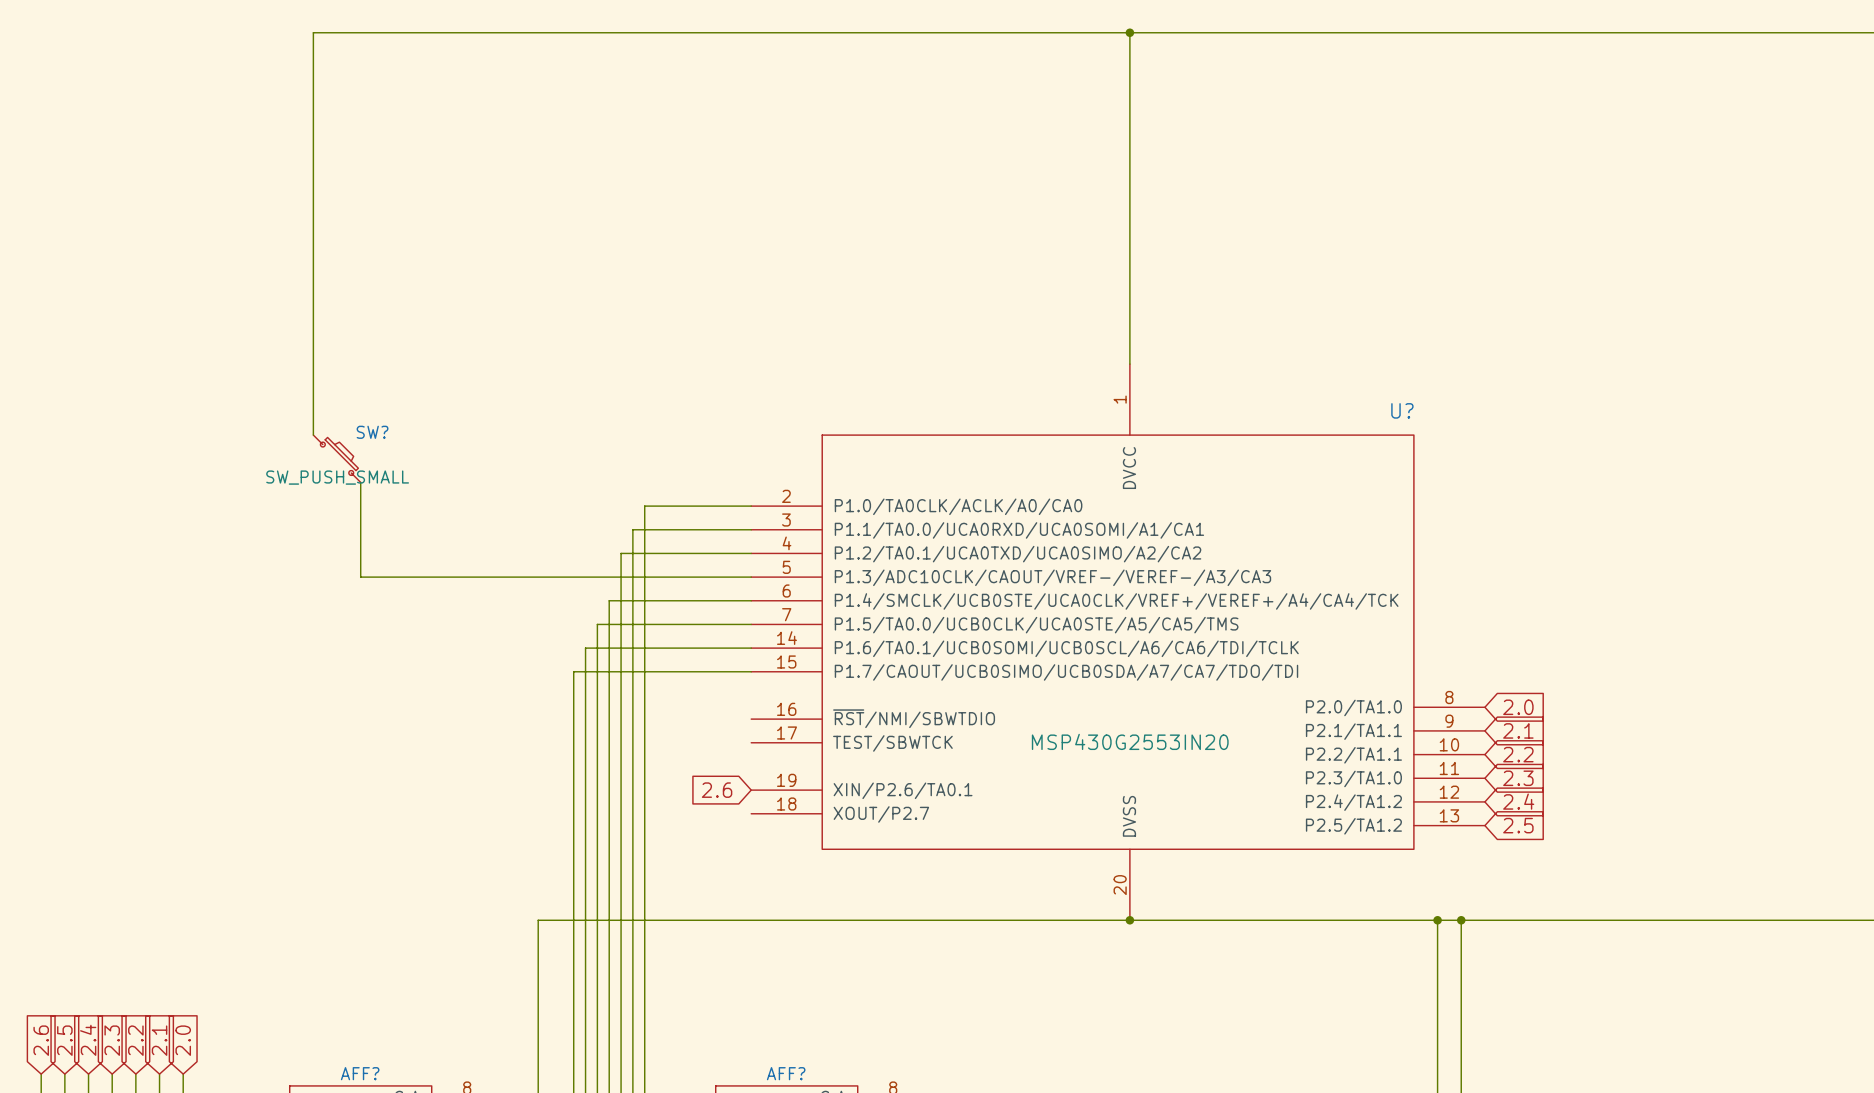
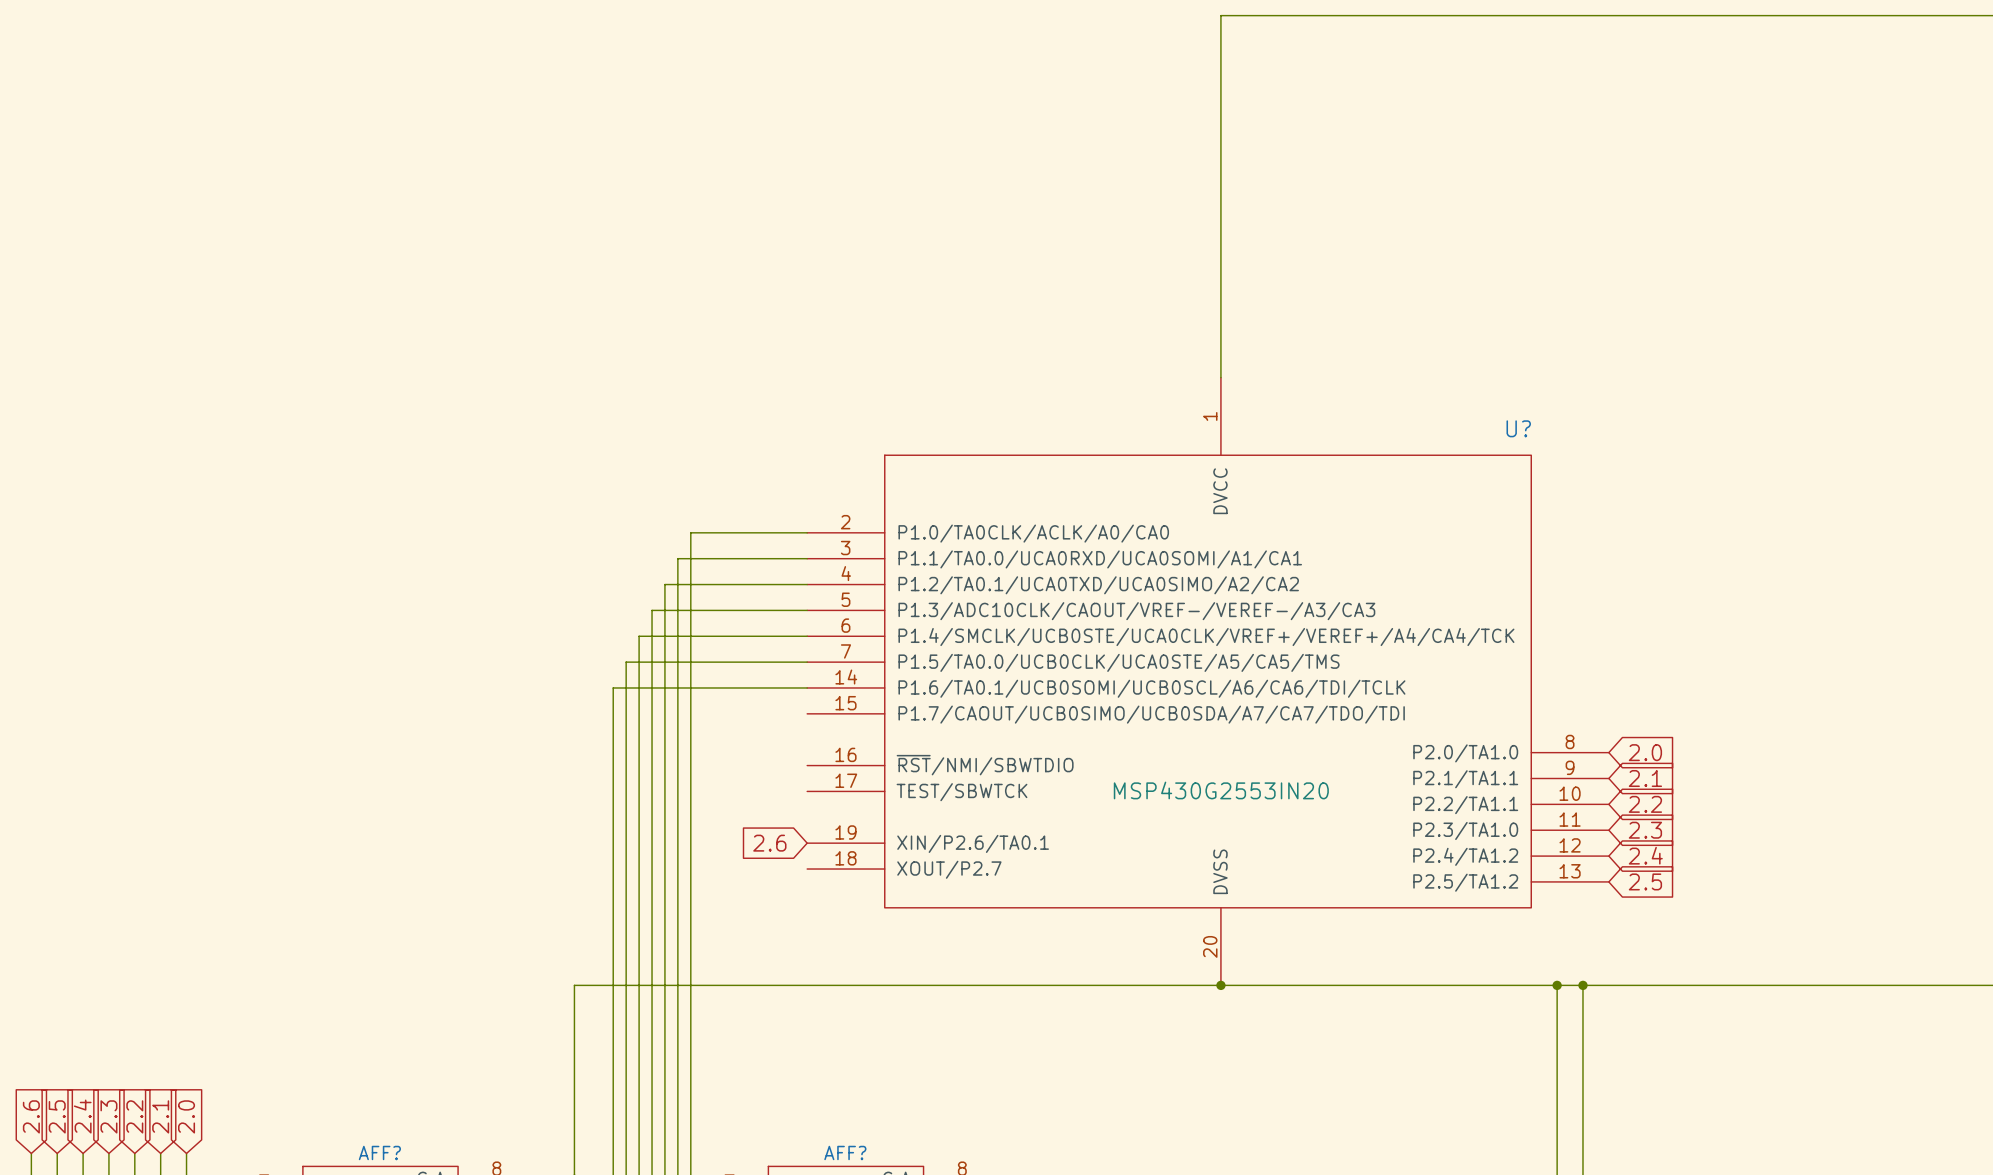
wire: (1129, 32) (313, 32) (313, 435) -> none
junction: (1129, 32) -> none
SW?: SW_PUSH_SMALL (337, 458) -> none
wire: (360, 482) (360, 577) (609, 577) -> none
wire: (573, 671) (751, 671) -> (613, 713) (613, 687) (626, 687) (626, 662) (639, 662) (639, 636) (652, 636) (652, 610)

